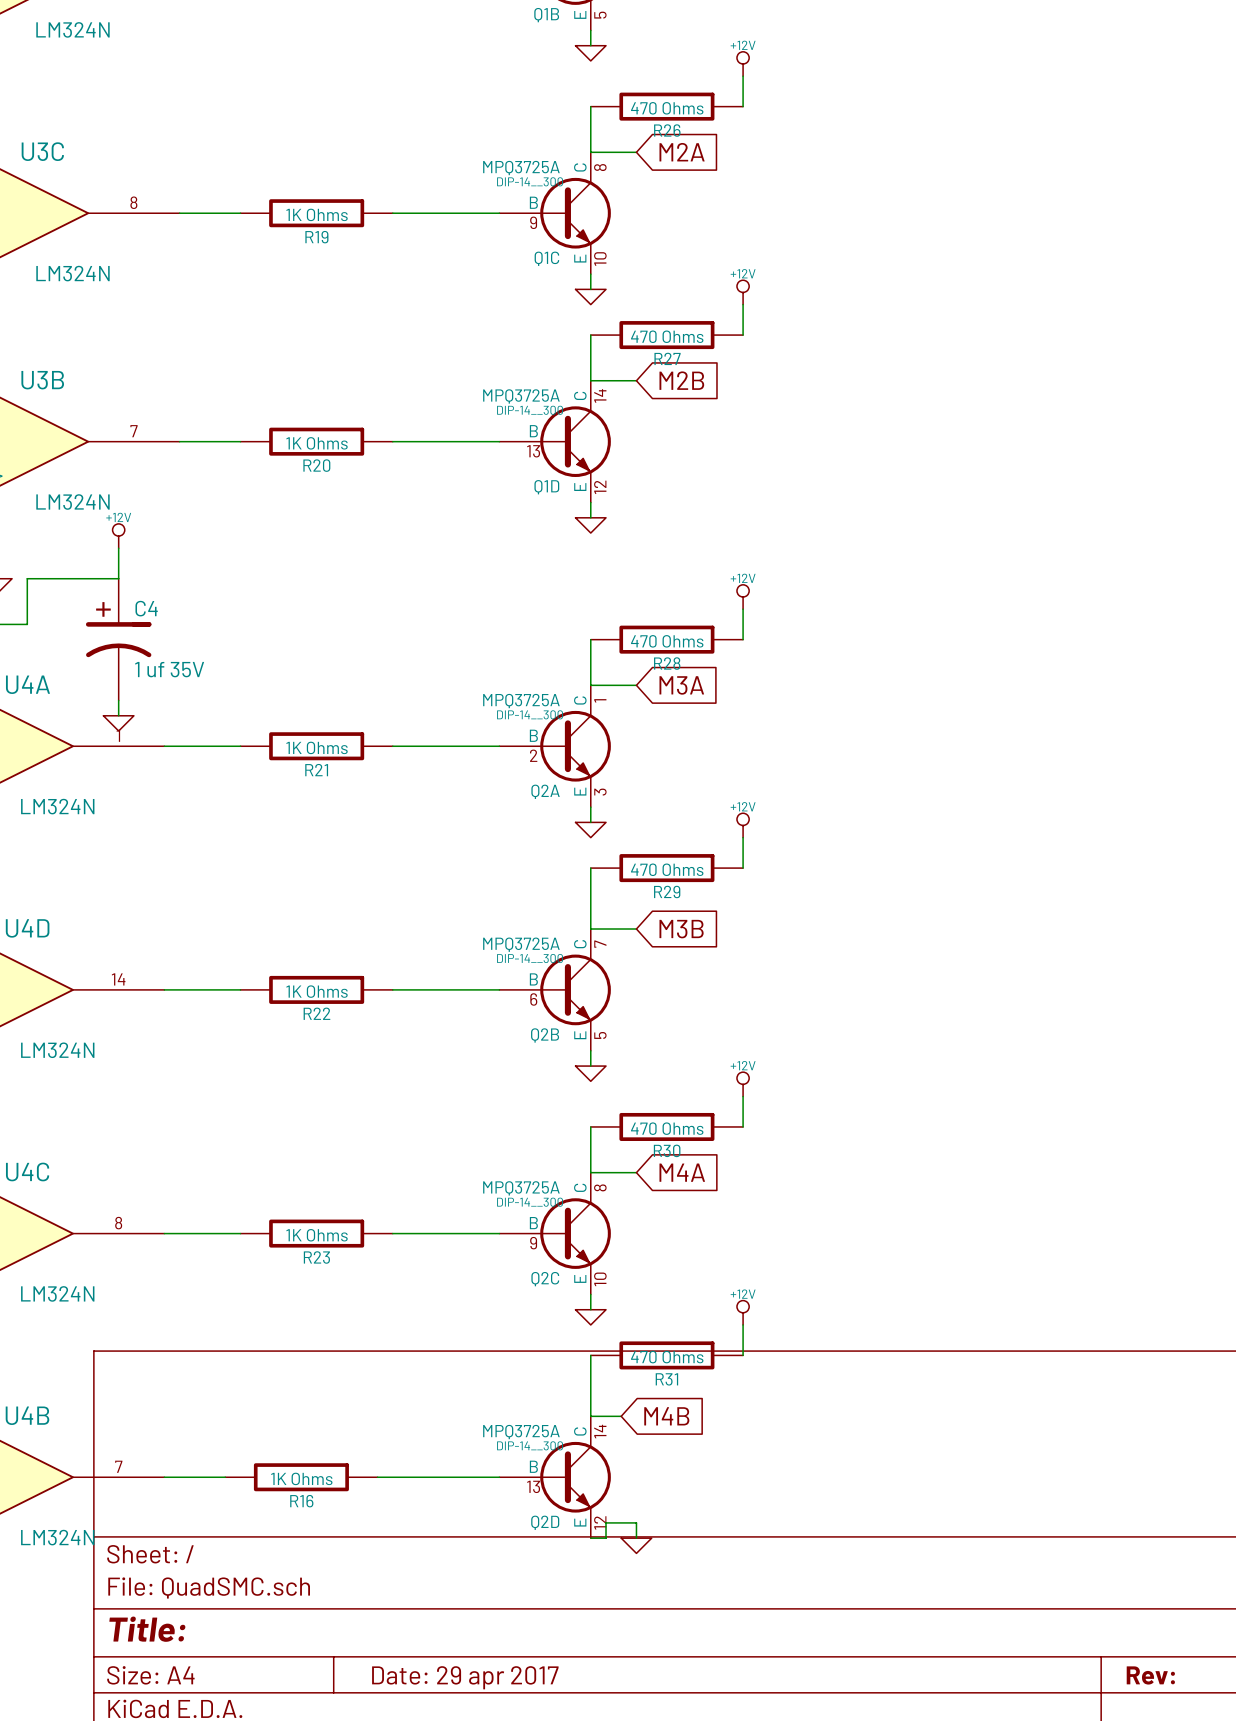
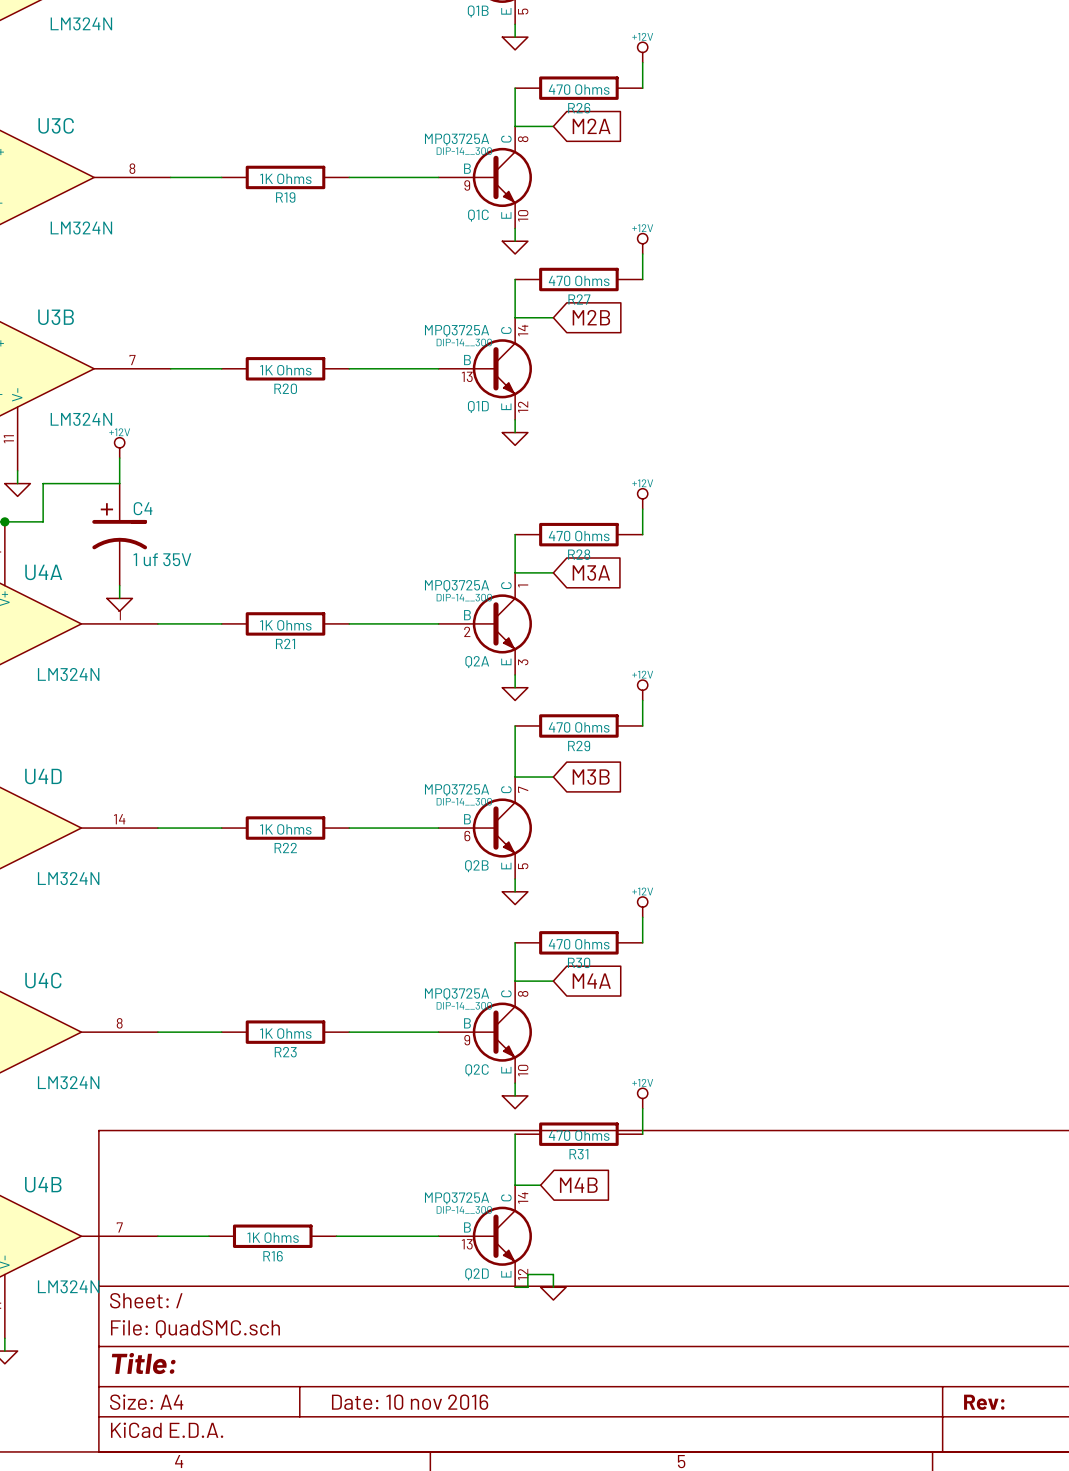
title block: Date: 29 apr 2017 (465, 1677) -> Date: 10 nov 2016 (410, 1402)

